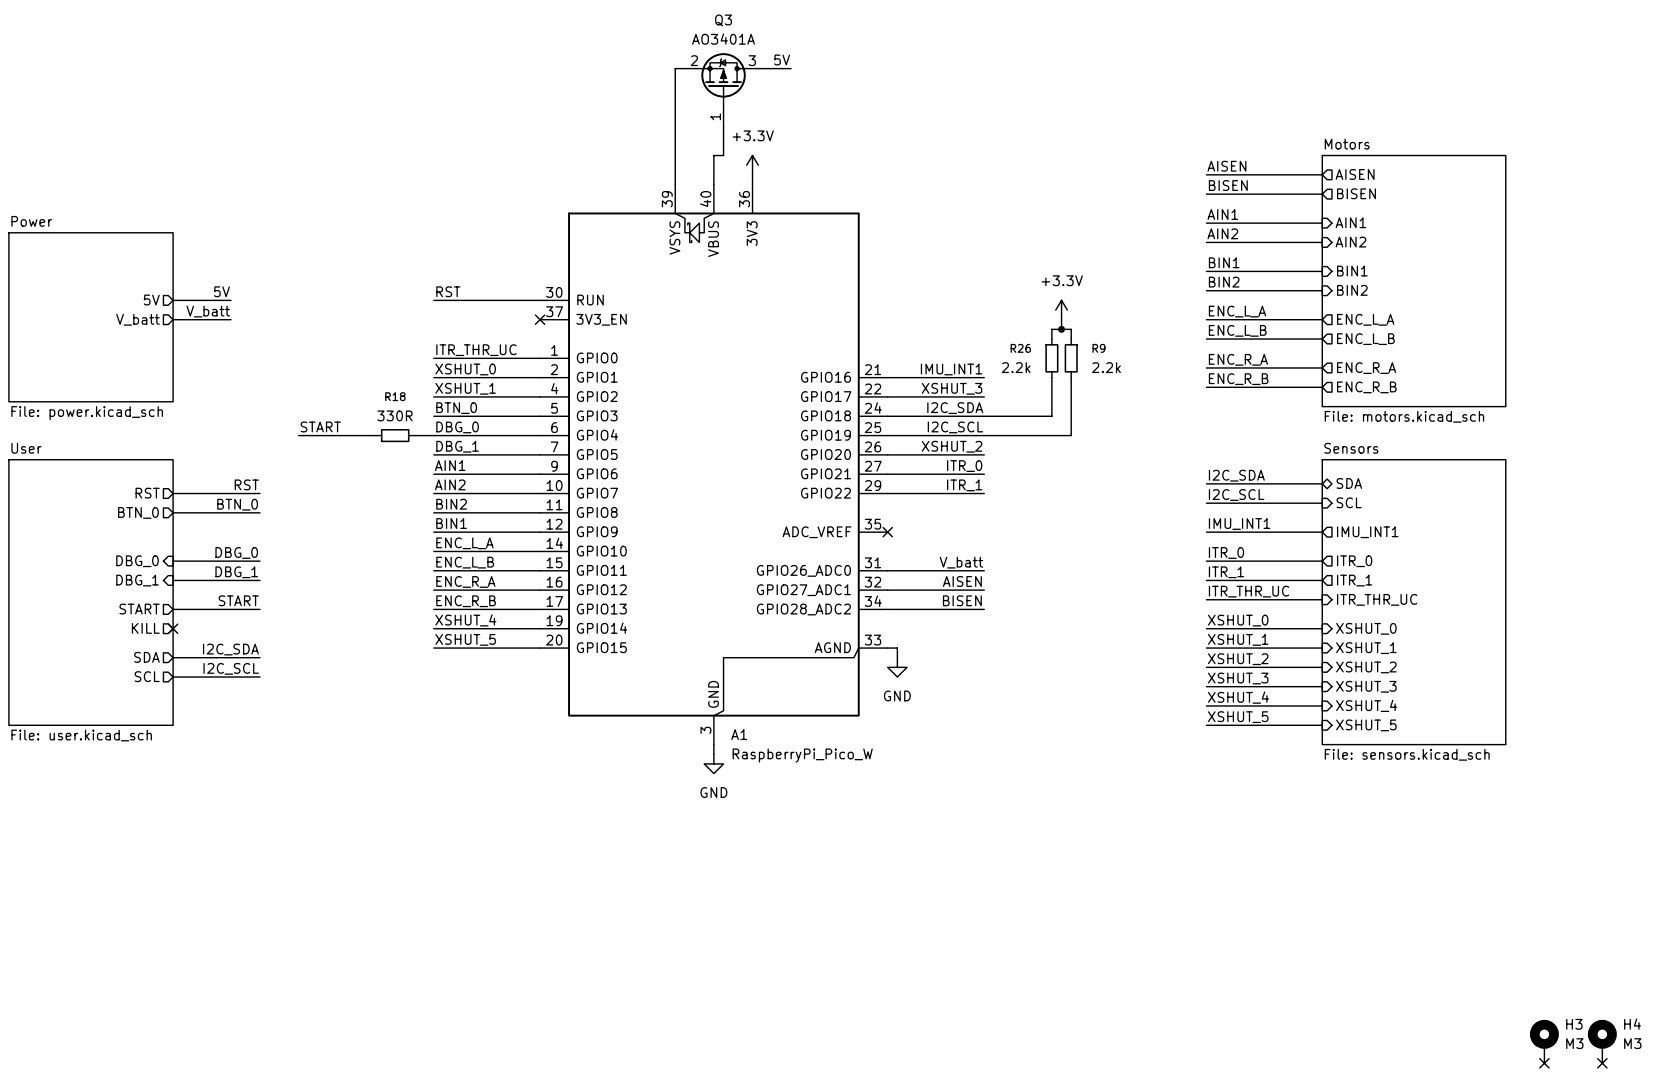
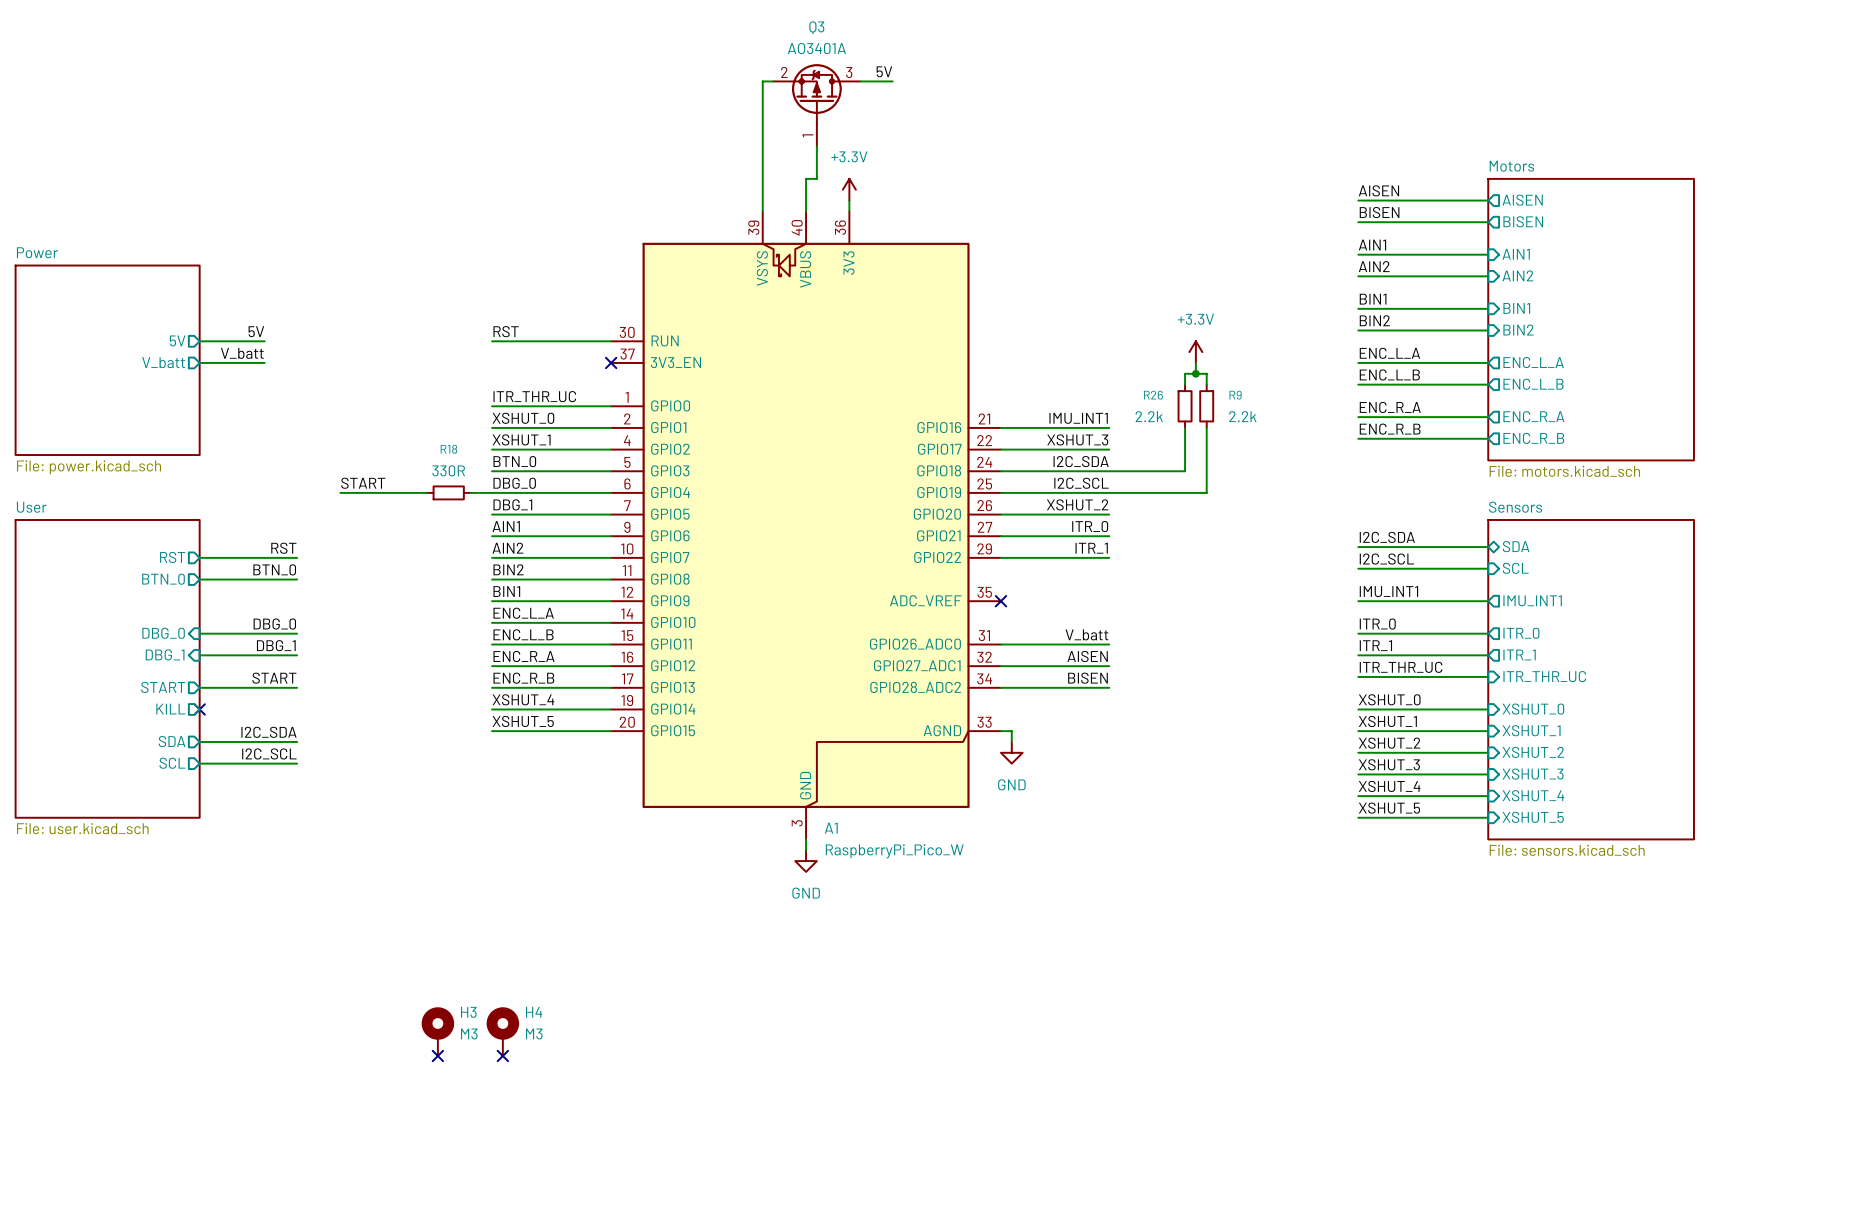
no-connect mark: none -> (437, 1055)
no-connect mark: none -> (502, 1055)
H3 position: (1544, 1041) -> (437, 1031)
H4 position: (1602, 1041) -> (502, 1031)
no-connect mark: (1544, 1063) -> none
no-connect mark: (1602, 1063) -> none

